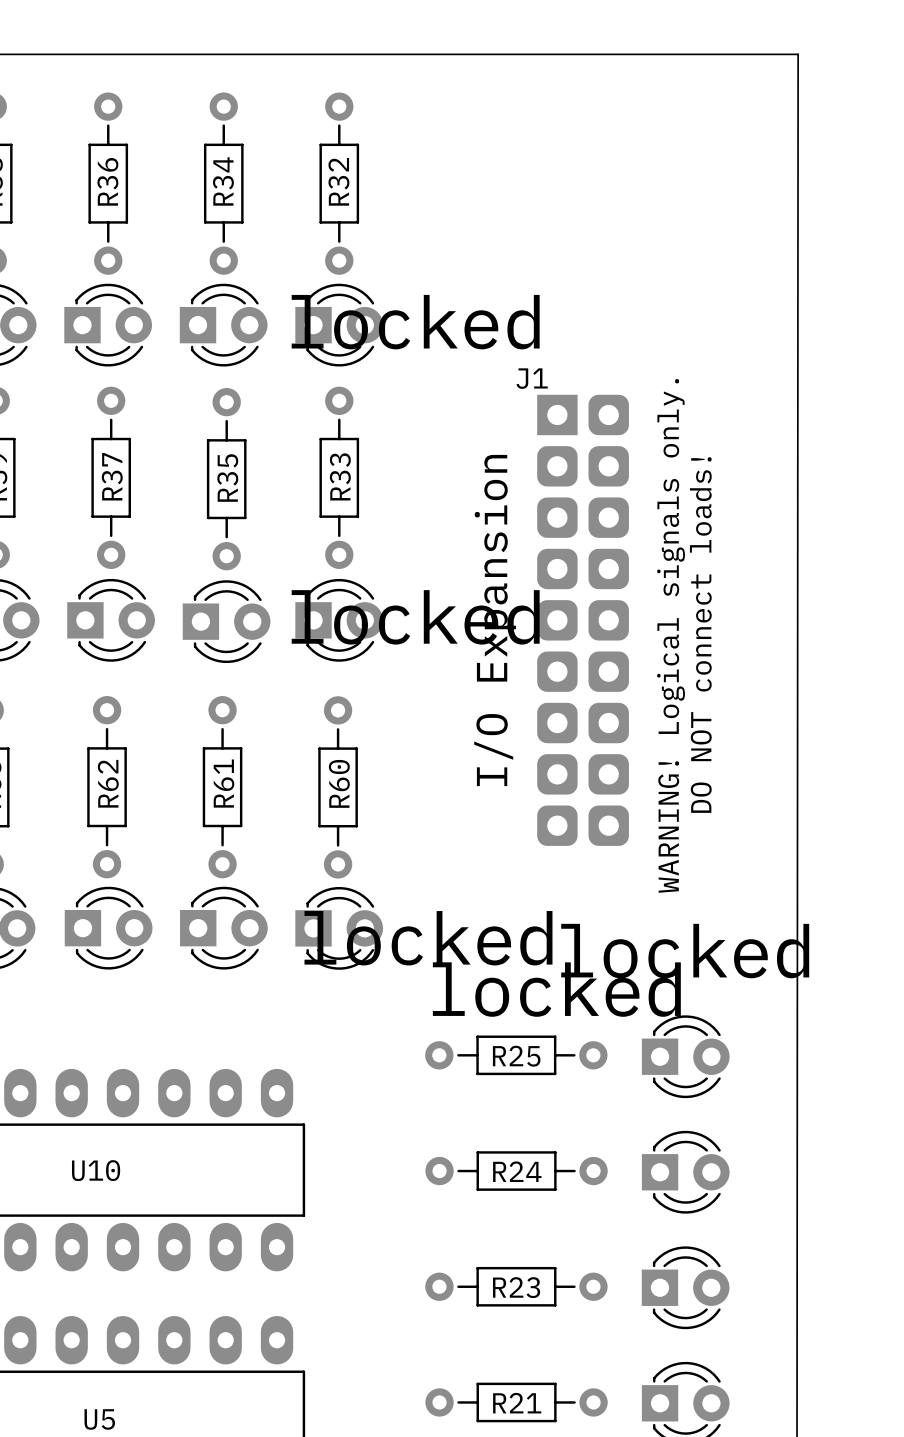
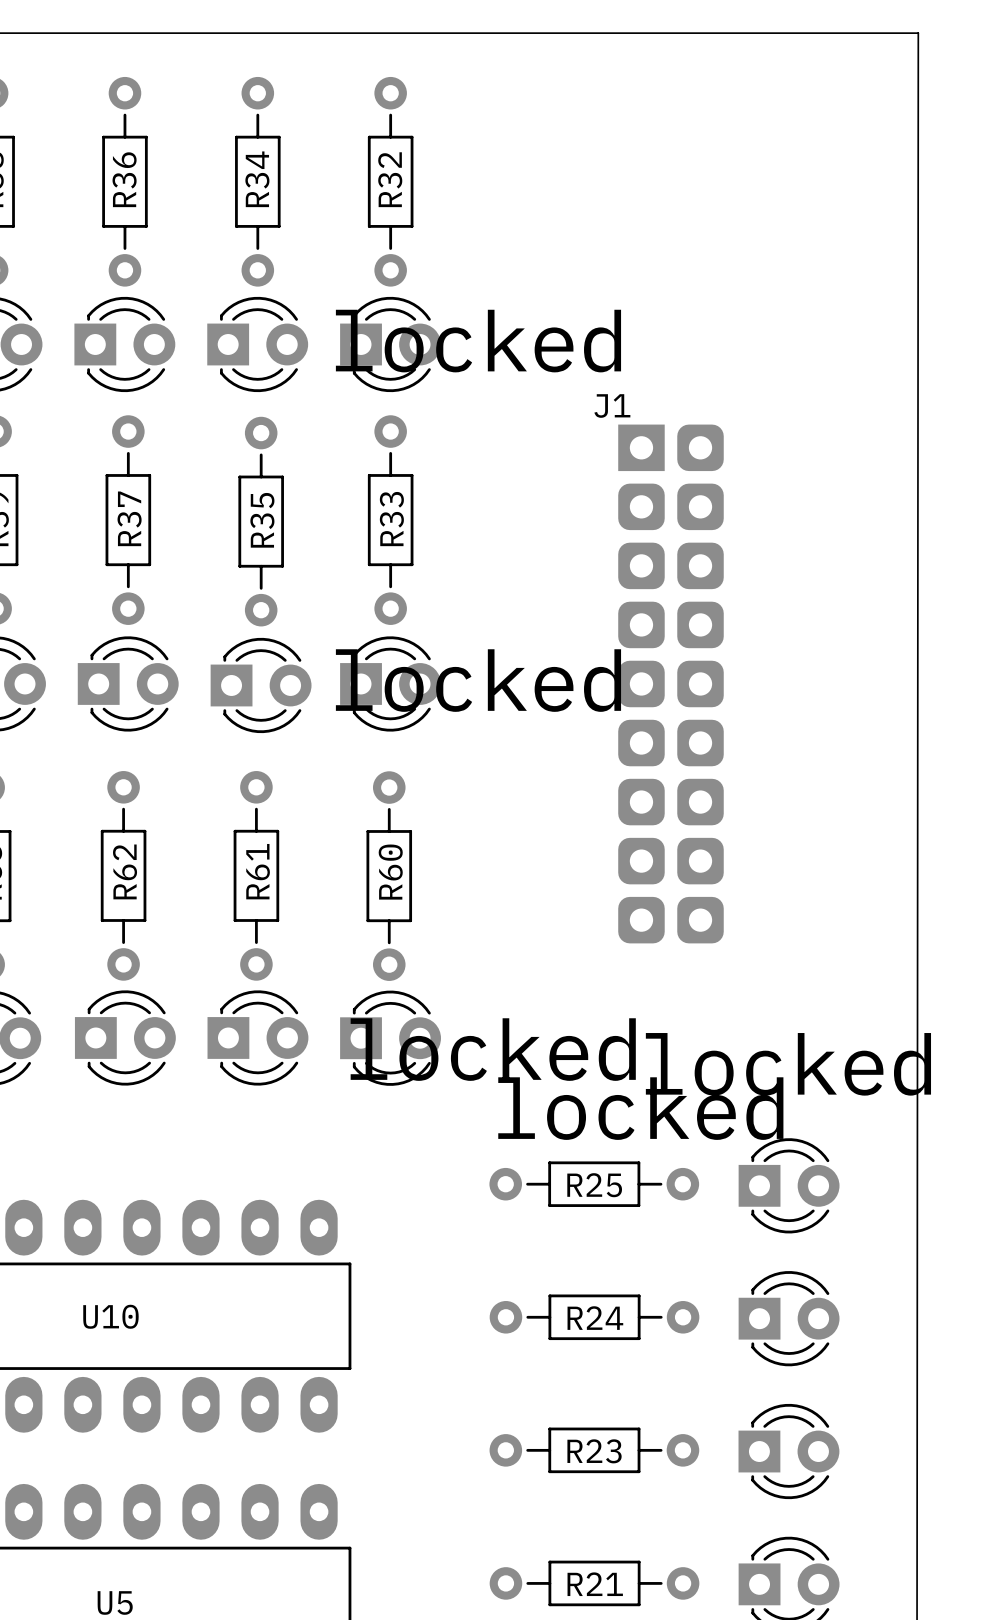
text: I/O Expansion (495, 620) -> none
text: WARNING! Logical signals only. (671, 635) -> none
text: DO NOT connect loads! (700, 635) -> none

